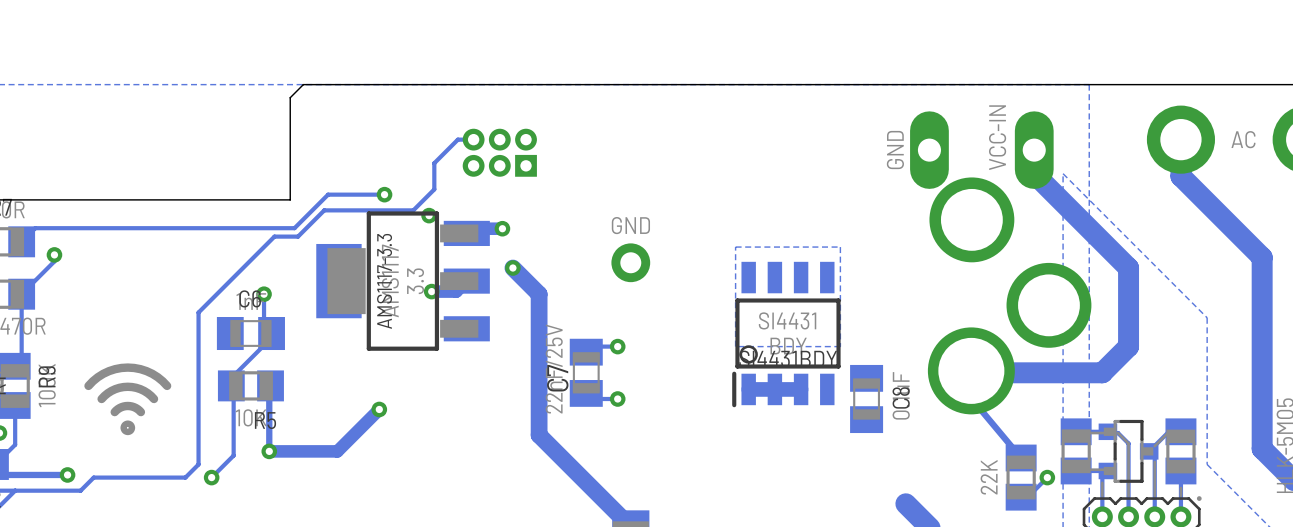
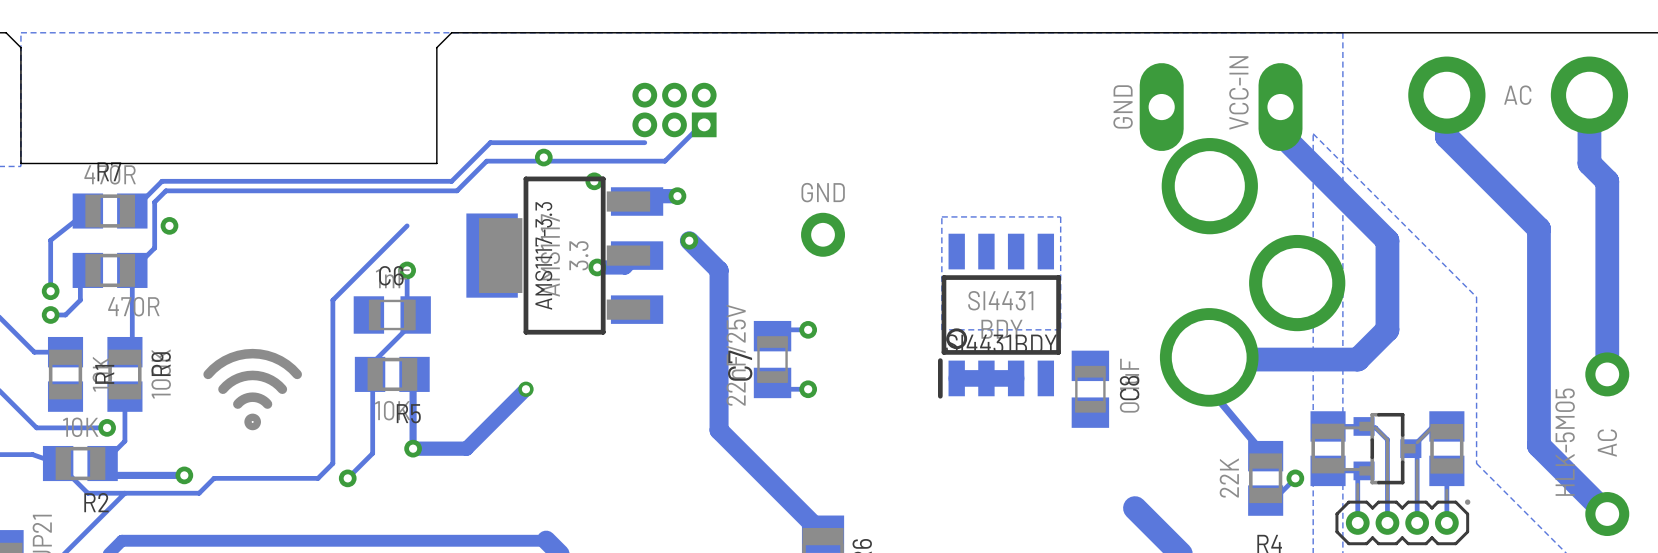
track: (473, 139) (457, 139) (434, 163) (434, 189) (413, 210) (324, 210) (298, 236) (274, 236) (198, 312) (198, 320) -> (407, 225) (332, 300)
track: (384, 194) (328, 194) (294, 228) (35, 228) -> (644, 142) (490, 142) (451, 181) (162, 181) (147, 195)
track: (54, 254) (54, 261) (41, 274) -> (704, 121) (664, 161) (486, 161) (457, 190) (165, 190) (154, 202) (154, 248)
track: (379, 409) (337, 451) (316, 451) -> (525, 389) (466, 448)
via position: (379, 409) -> (525, 389)

